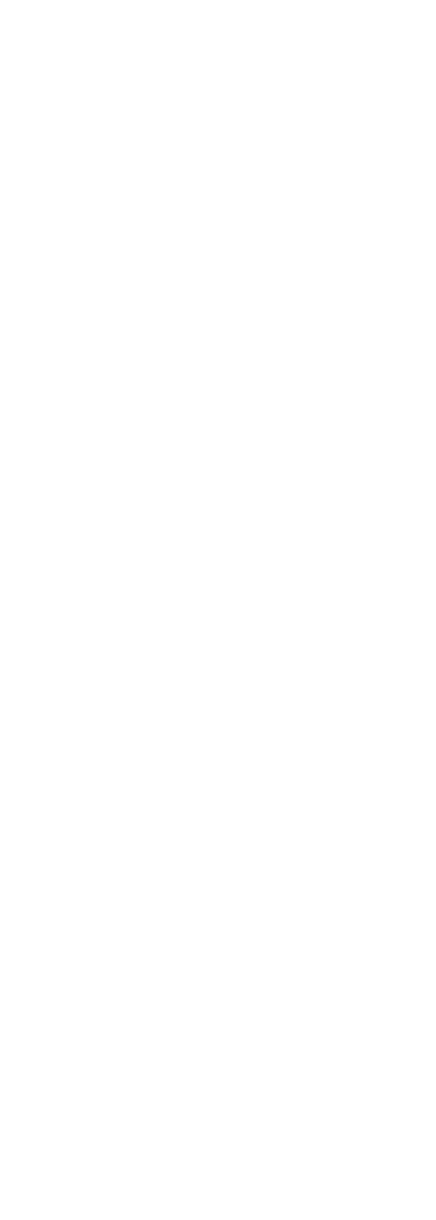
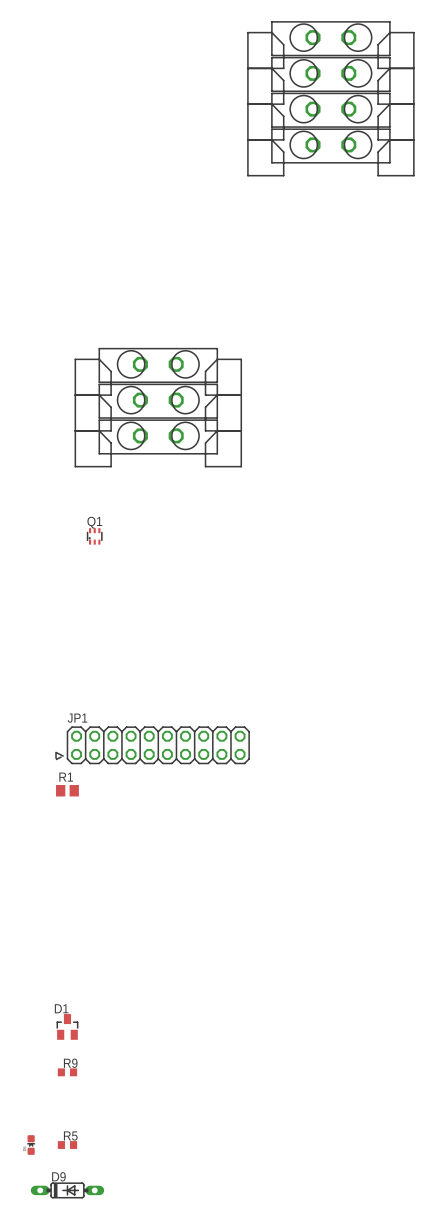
part: none -> (330, 98)
part: none -> (158, 407)
Q1: none -> (94, 536)
JP1: none -> (152, 745)
R1: none -> (67, 790)
D1: none -> (67, 1026)
R9: none -> (67, 1072)
part: none -> (31, 1145)
R5: none -> (67, 1145)
D9: none -> (67, 1190)

